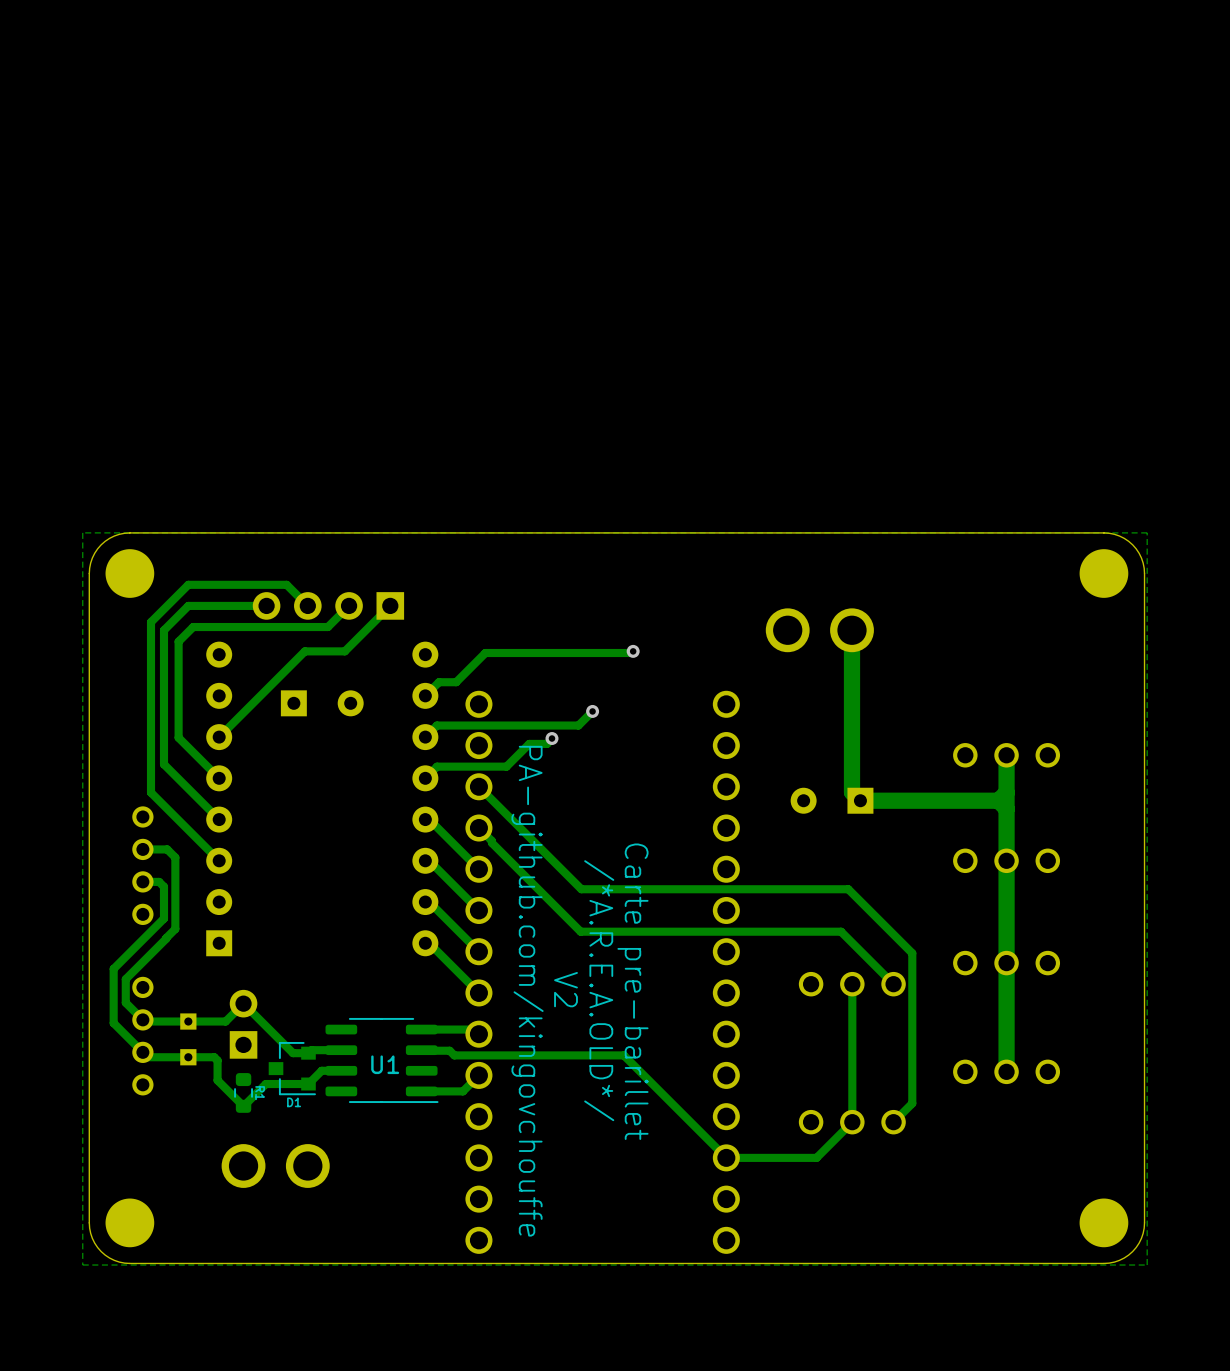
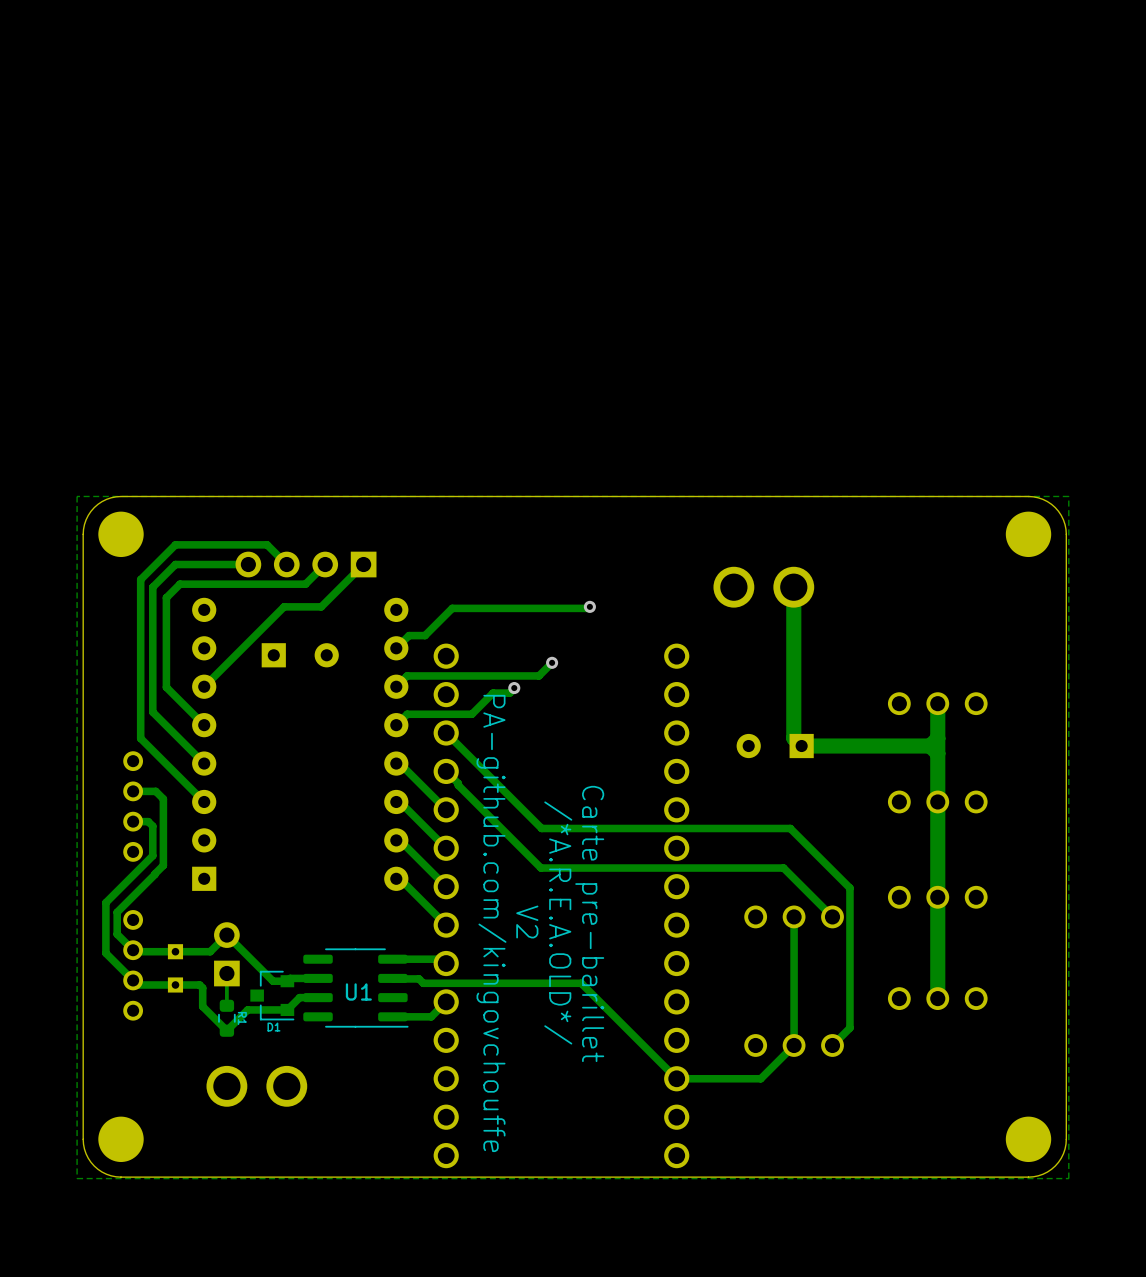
track: none -> (226, 973) (226, 1005)

